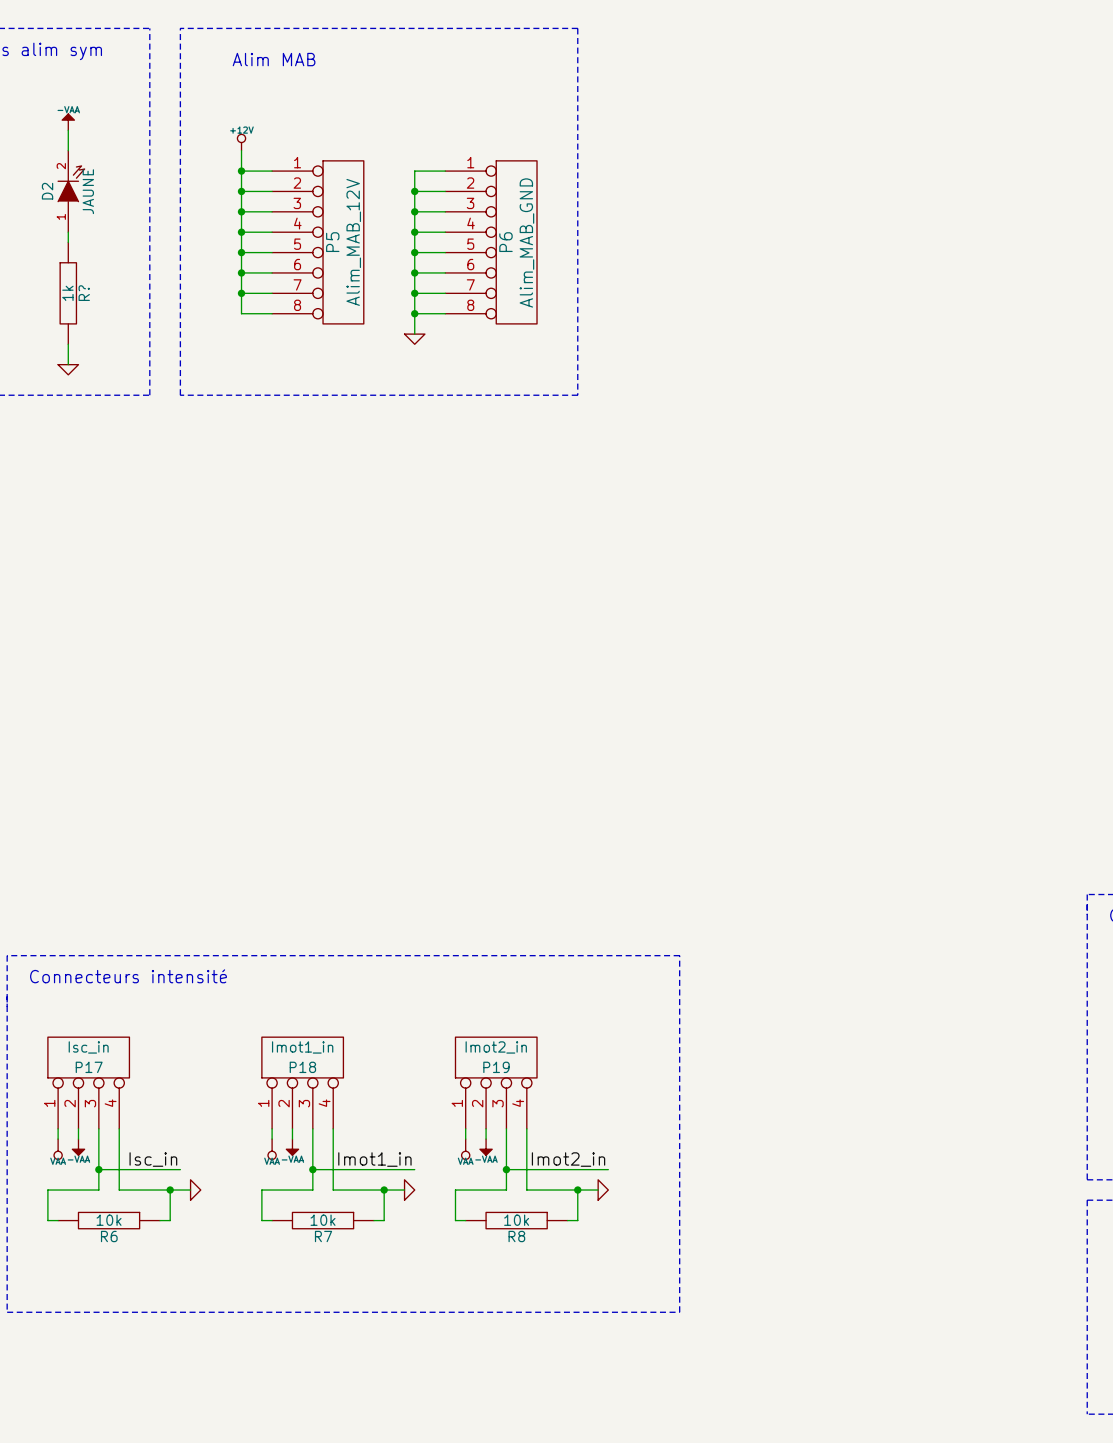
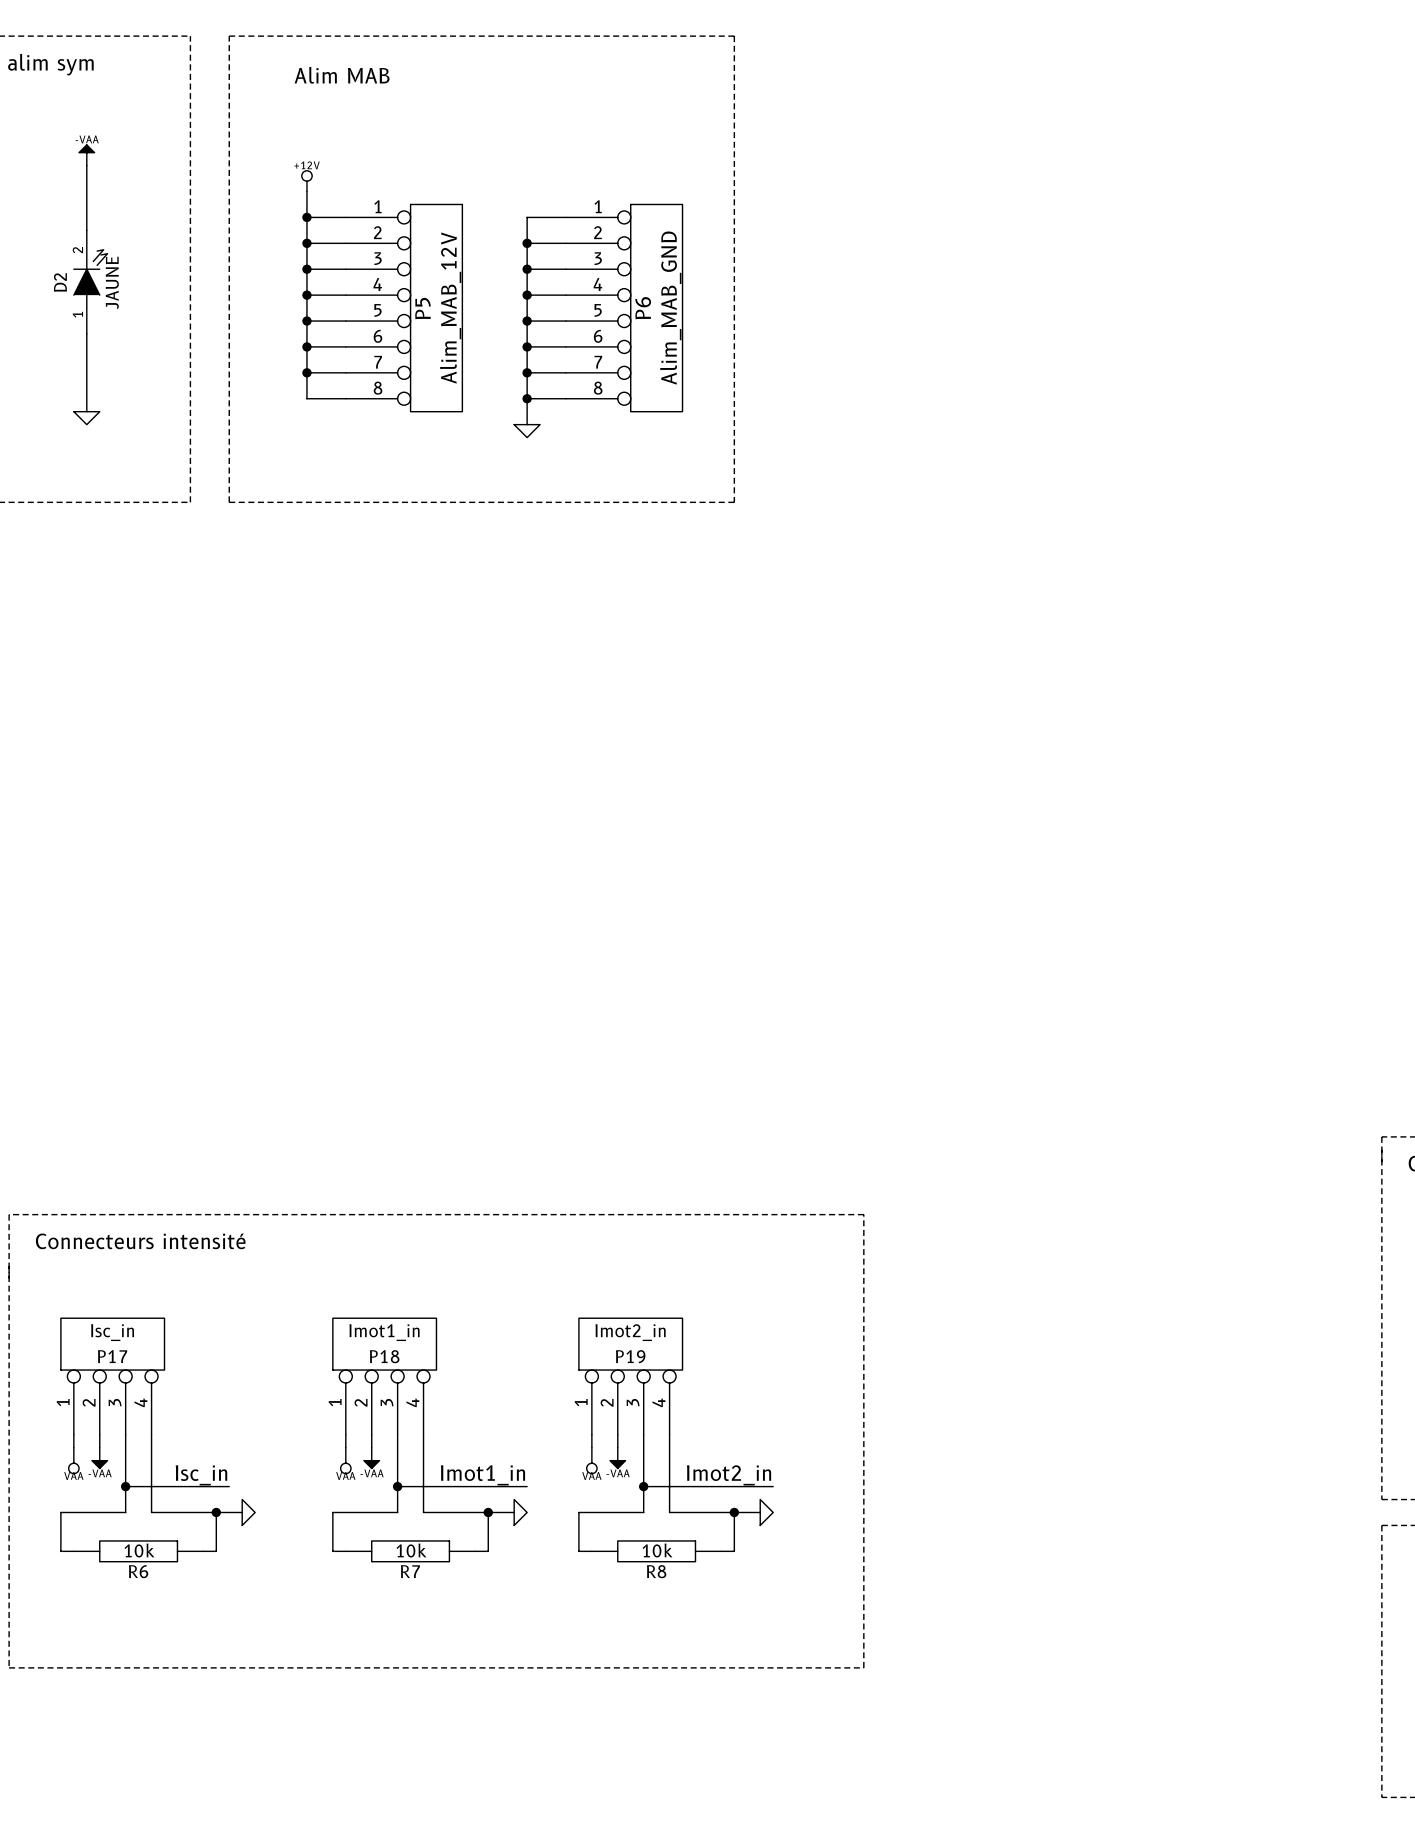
D2 position: (71, 191) -> (90, 282)
wire: none -> (86, 333) (86, 411)
R?: 1k (68, 293) -> none
wire: (68, 344) (68, 364) -> none
power symbol position: (68, 369) -> (86, 418)

